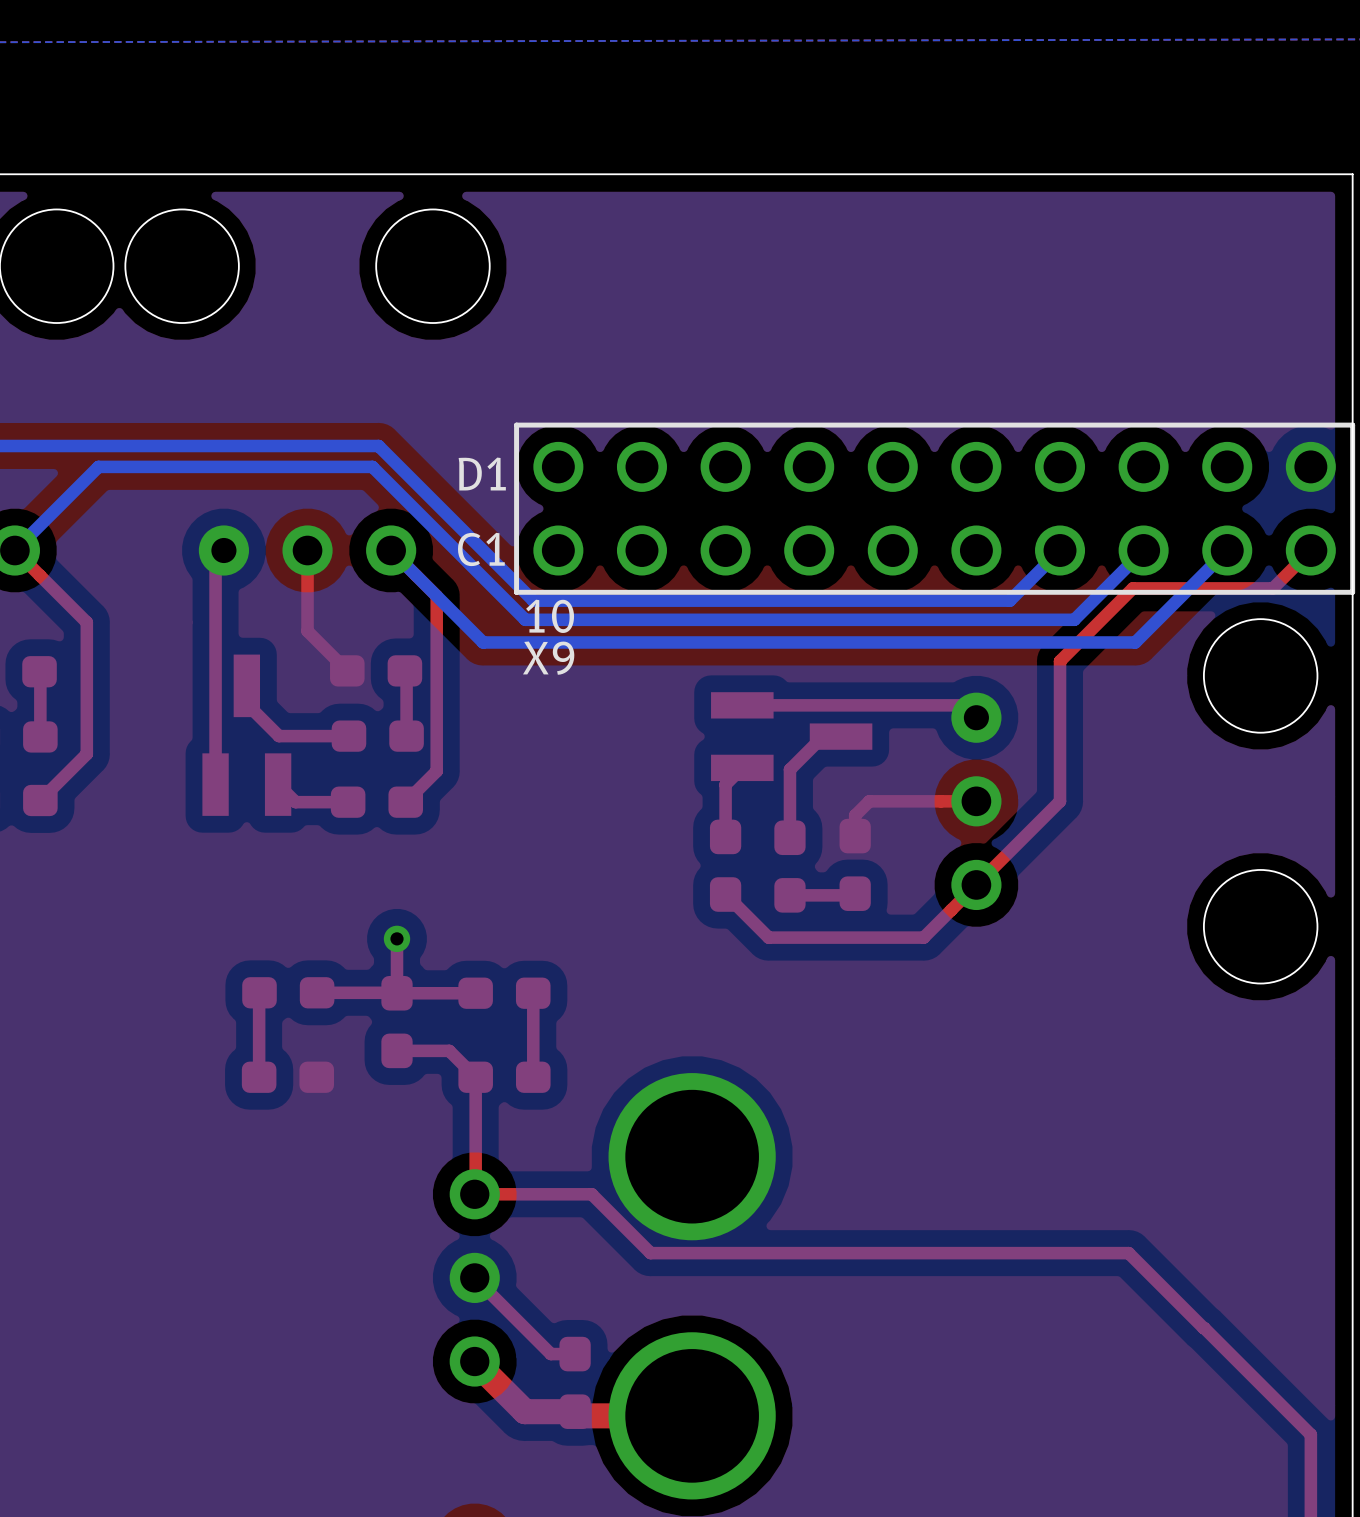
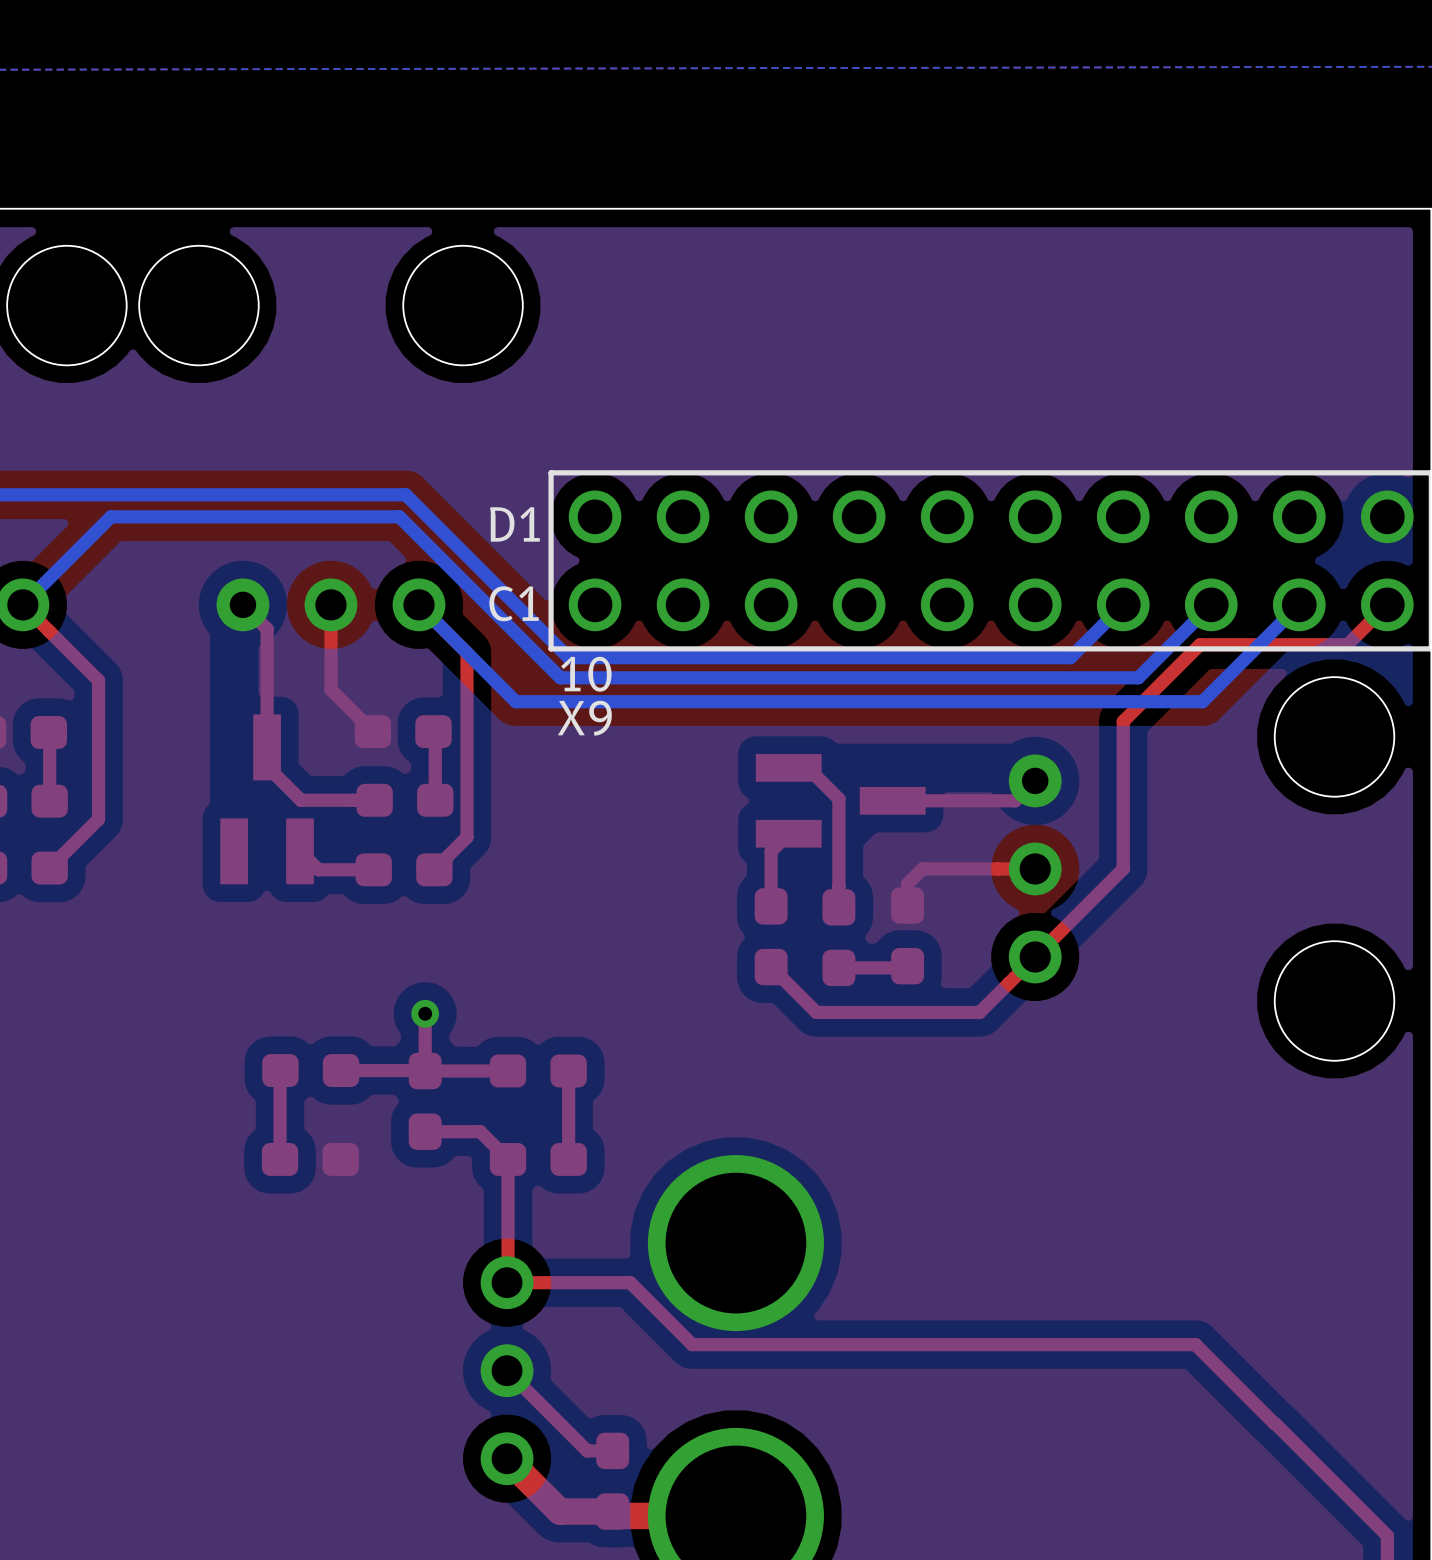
top track: (223, 550) (215, 558) (215, 766) -> (242, 604) (267, 628) (267, 747)
top track: (964, 705) (760, 705) -> none
top track: none -> (1035, 780) (1015, 800) (892, 800)
top track: (822, 736) (789, 769) -> (807, 767) (838, 799) (838, 835)

